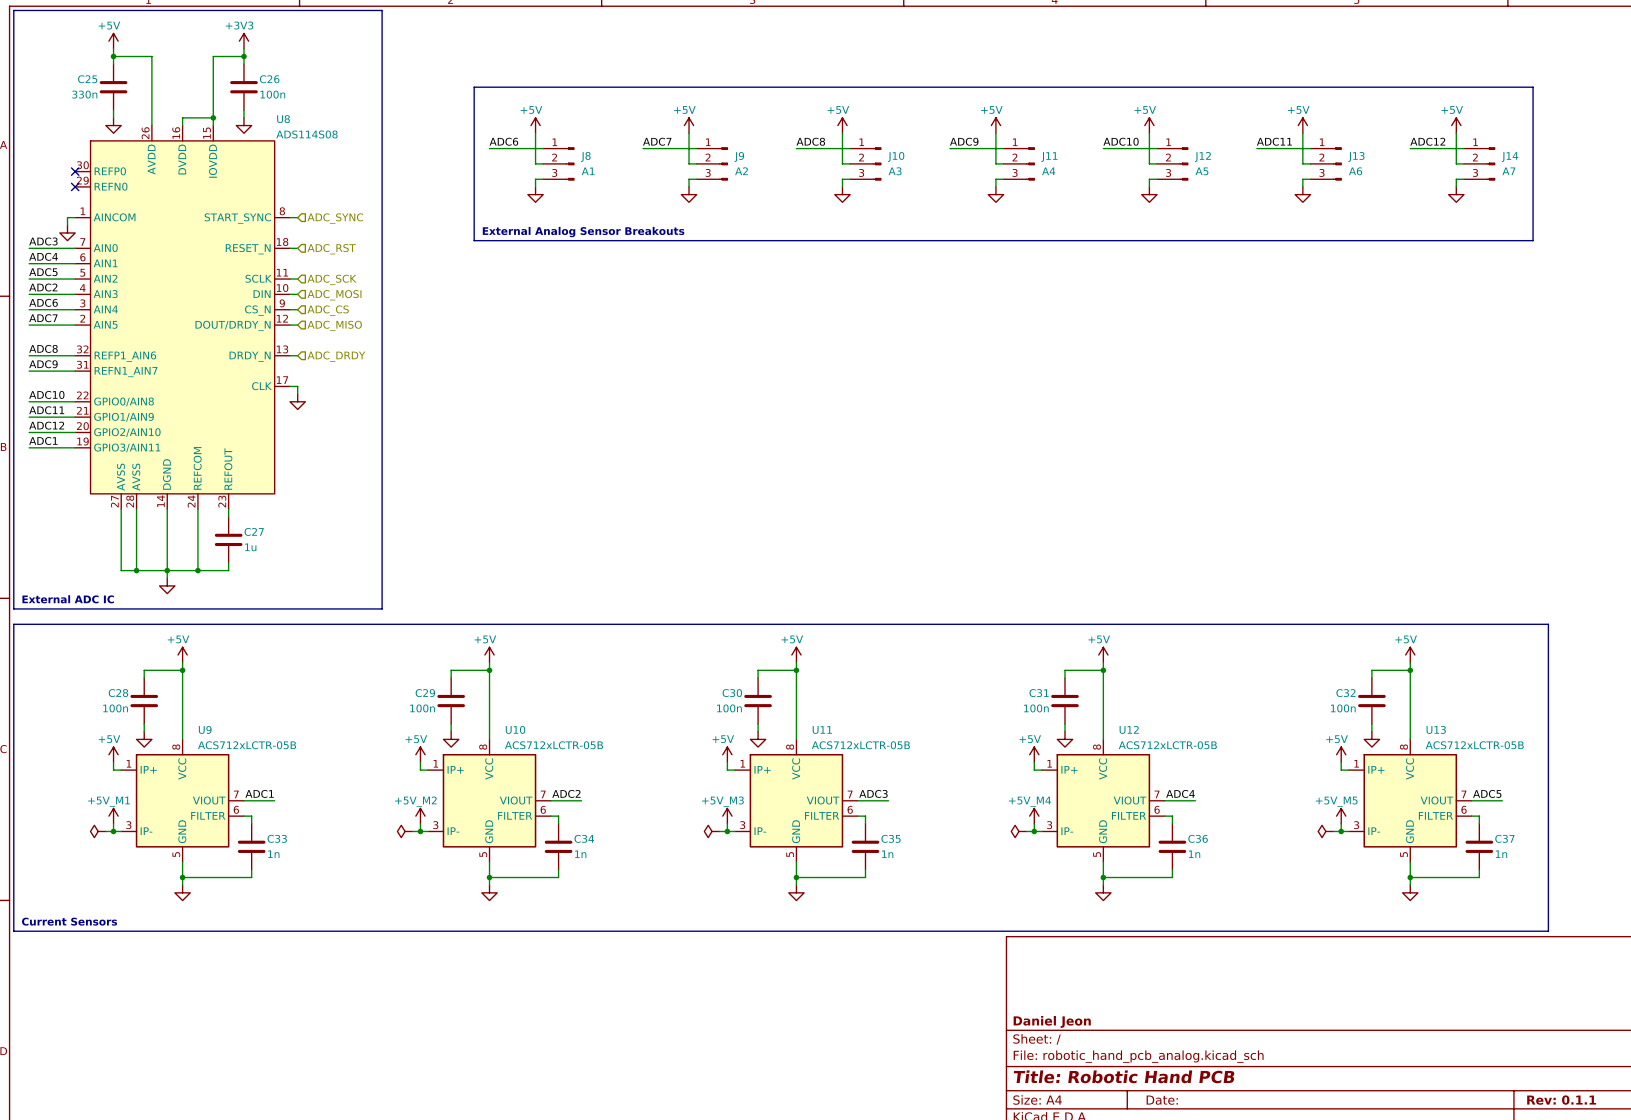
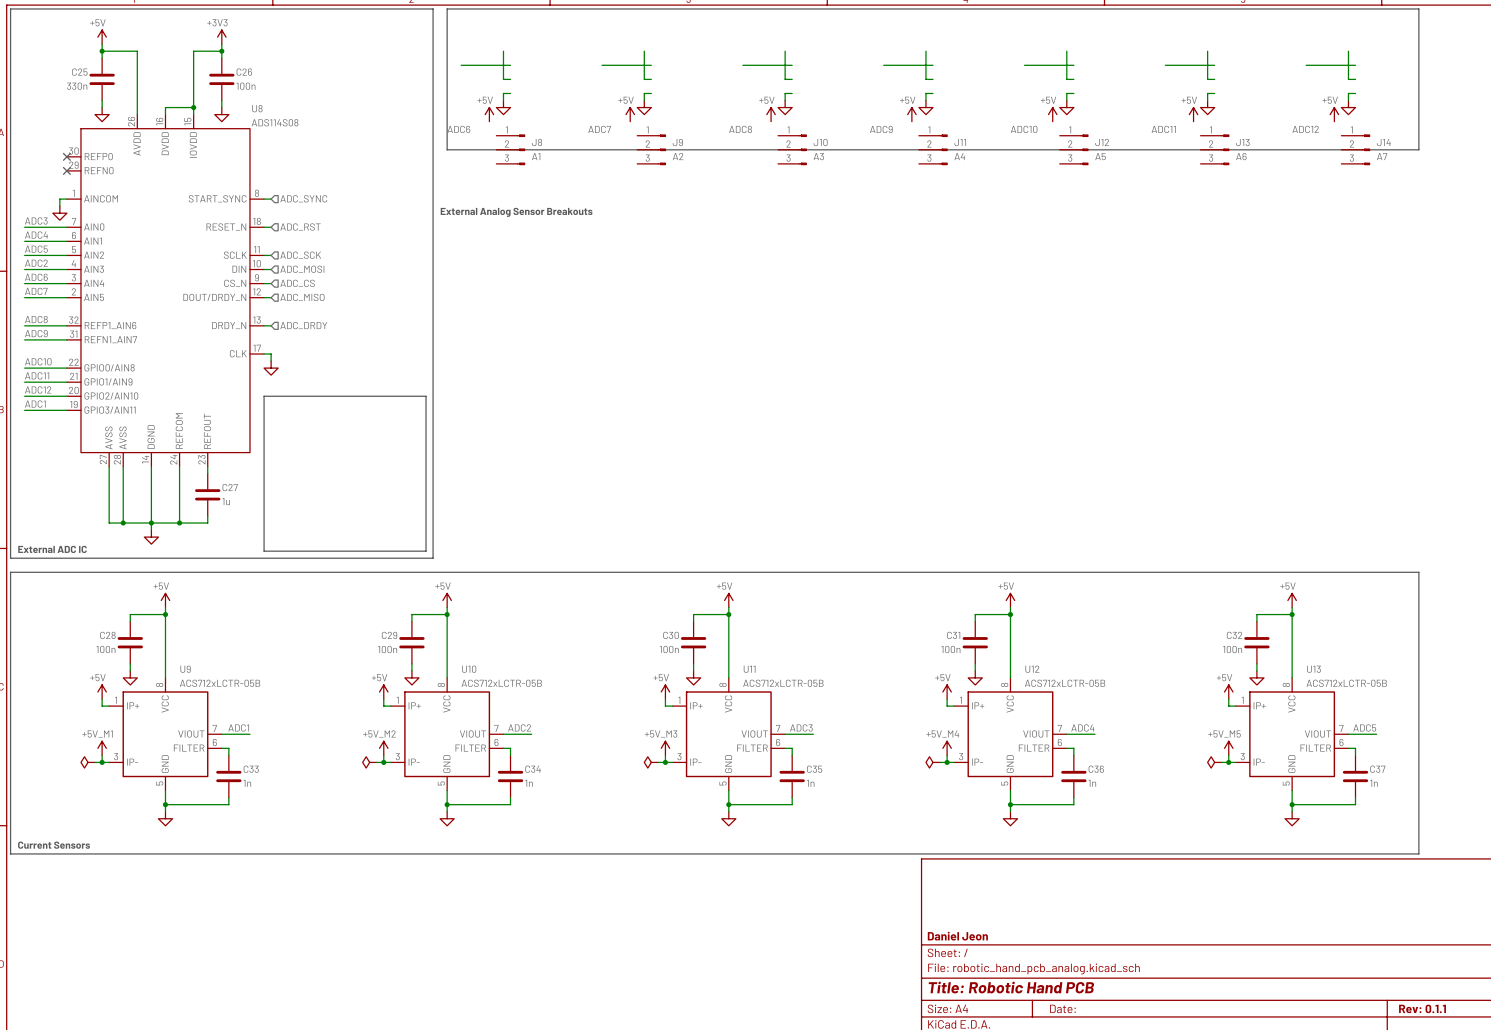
line: (382, 10) (382, 608) -> (433, 220) (433, 558) (348, 558)
line: none -> (447, 8) (1418, 8) (1418, 149) (447, 149) (447, 8)
line: (474, 87) (1533, 87) (1533, 240) (474, 240) -> (433, 79) (433, 8) (348, 8)
wire: (535, 133) (535, 163) (543, 163) -> (503, 51) (503, 79) (510, 79)
wire: (689, 133) (689, 163) (696, 163) -> (644, 51) (644, 79) (651, 79)
wire: (842, 133) (842, 163) (850, 163) -> (785, 51) (785, 79) (792, 79)
wire: (995, 133) (995, 163) (1003, 163) -> (925, 51) (925, 79) (933, 79)
wire: (1149, 133) (1149, 163) (1157, 163) -> (1066, 51) (1066, 79) (1073, 79)
wire: (1302, 133) (1302, 163) (1310, 163) -> (1207, 51) (1207, 79) (1214, 79)
wire: (1456, 133) (1456, 163) (1463, 163) -> (1348, 51) (1348, 79) (1355, 79)
wire: (489, 148) (543, 148) -> (461, 65) (510, 65)
wire: (642, 148) (696, 148) -> (602, 65) (651, 65)
wire: (796, 148) (850, 148) -> (742, 65) (792, 65)
wire: (949, 148) (1003, 148) -> (883, 65) (933, 65)
wire: (1103, 148) (1157, 148) -> (1024, 65) (1073, 65)
wire: (1256, 148) (1310, 148) -> (1165, 65) (1214, 65)
wire: (1410, 148) (1463, 148) -> (1306, 65) (1355, 65)
wire: (543, 179) (535, 179) (535, 186) -> (510, 93) (503, 93) (503, 100)
wire: (696, 179) (689, 179) (689, 186) -> (651, 93) (644, 93) (644, 100)
wire: (850, 179) (842, 179) (842, 186) -> (792, 93) (785, 93) (785, 100)
wire: (1003, 179) (995, 179) (995, 186) -> (933, 93) (925, 93) (925, 100)
wire: (1157, 179) (1149, 179) (1149, 186) -> (1073, 93) (1066, 93) (1066, 100)
wire: (1310, 179) (1302, 179) (1302, 186) -> (1214, 93) (1207, 93) (1207, 100)
wire: (1463, 179) (1456, 179) (1456, 186) -> (1355, 93) (1348, 93) (1348, 100)
power symbol position: (535, 194) -> (503, 107)
power symbol position: (689, 194) -> (644, 107)
power symbol position: (842, 194) -> (785, 107)
power symbol position: (995, 194) -> (925, 107)
power symbol position: (1149, 194) -> (1066, 107)
power symbol position: (1302, 194) -> (1207, 107)
power symbol position: (1456, 194) -> (1348, 107)
line: none -> (264, 396) (426, 396) (426, 551) (264, 551) (264, 396)

